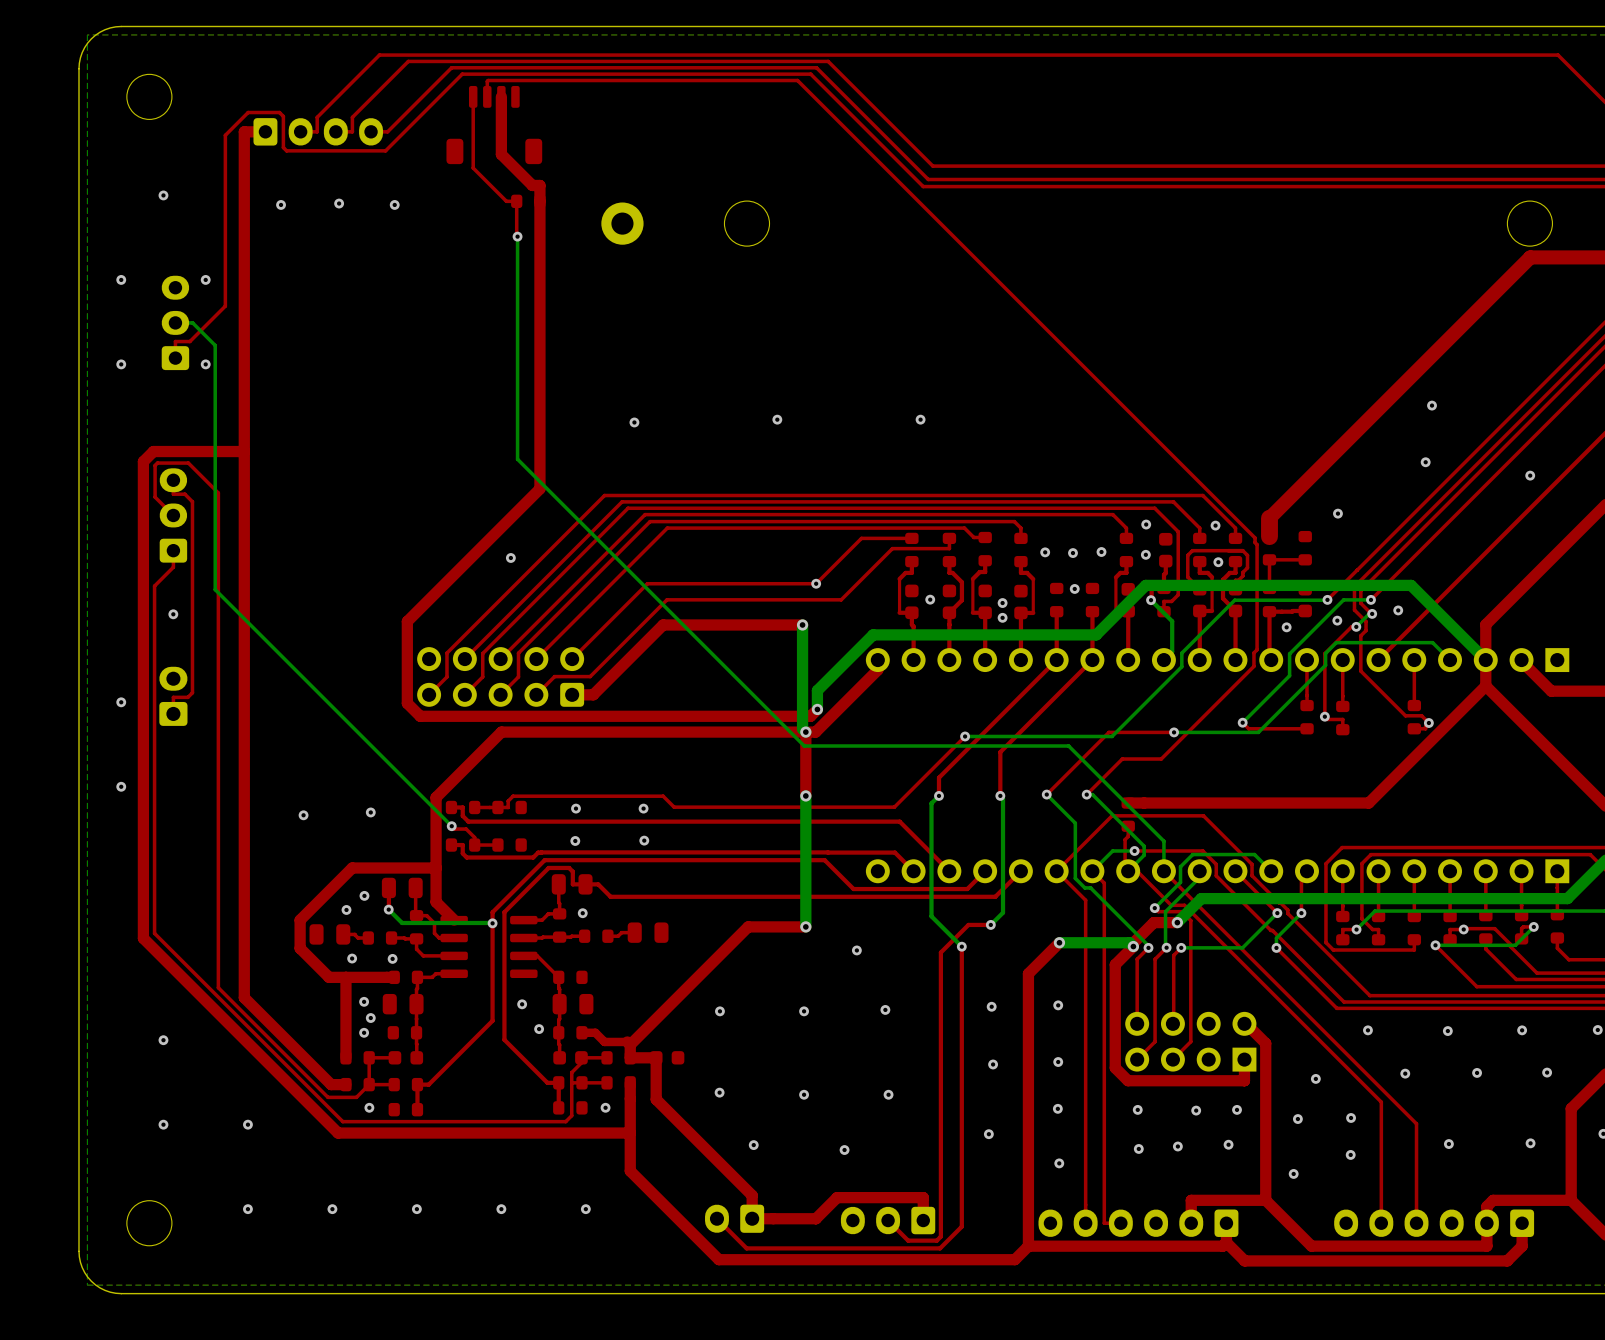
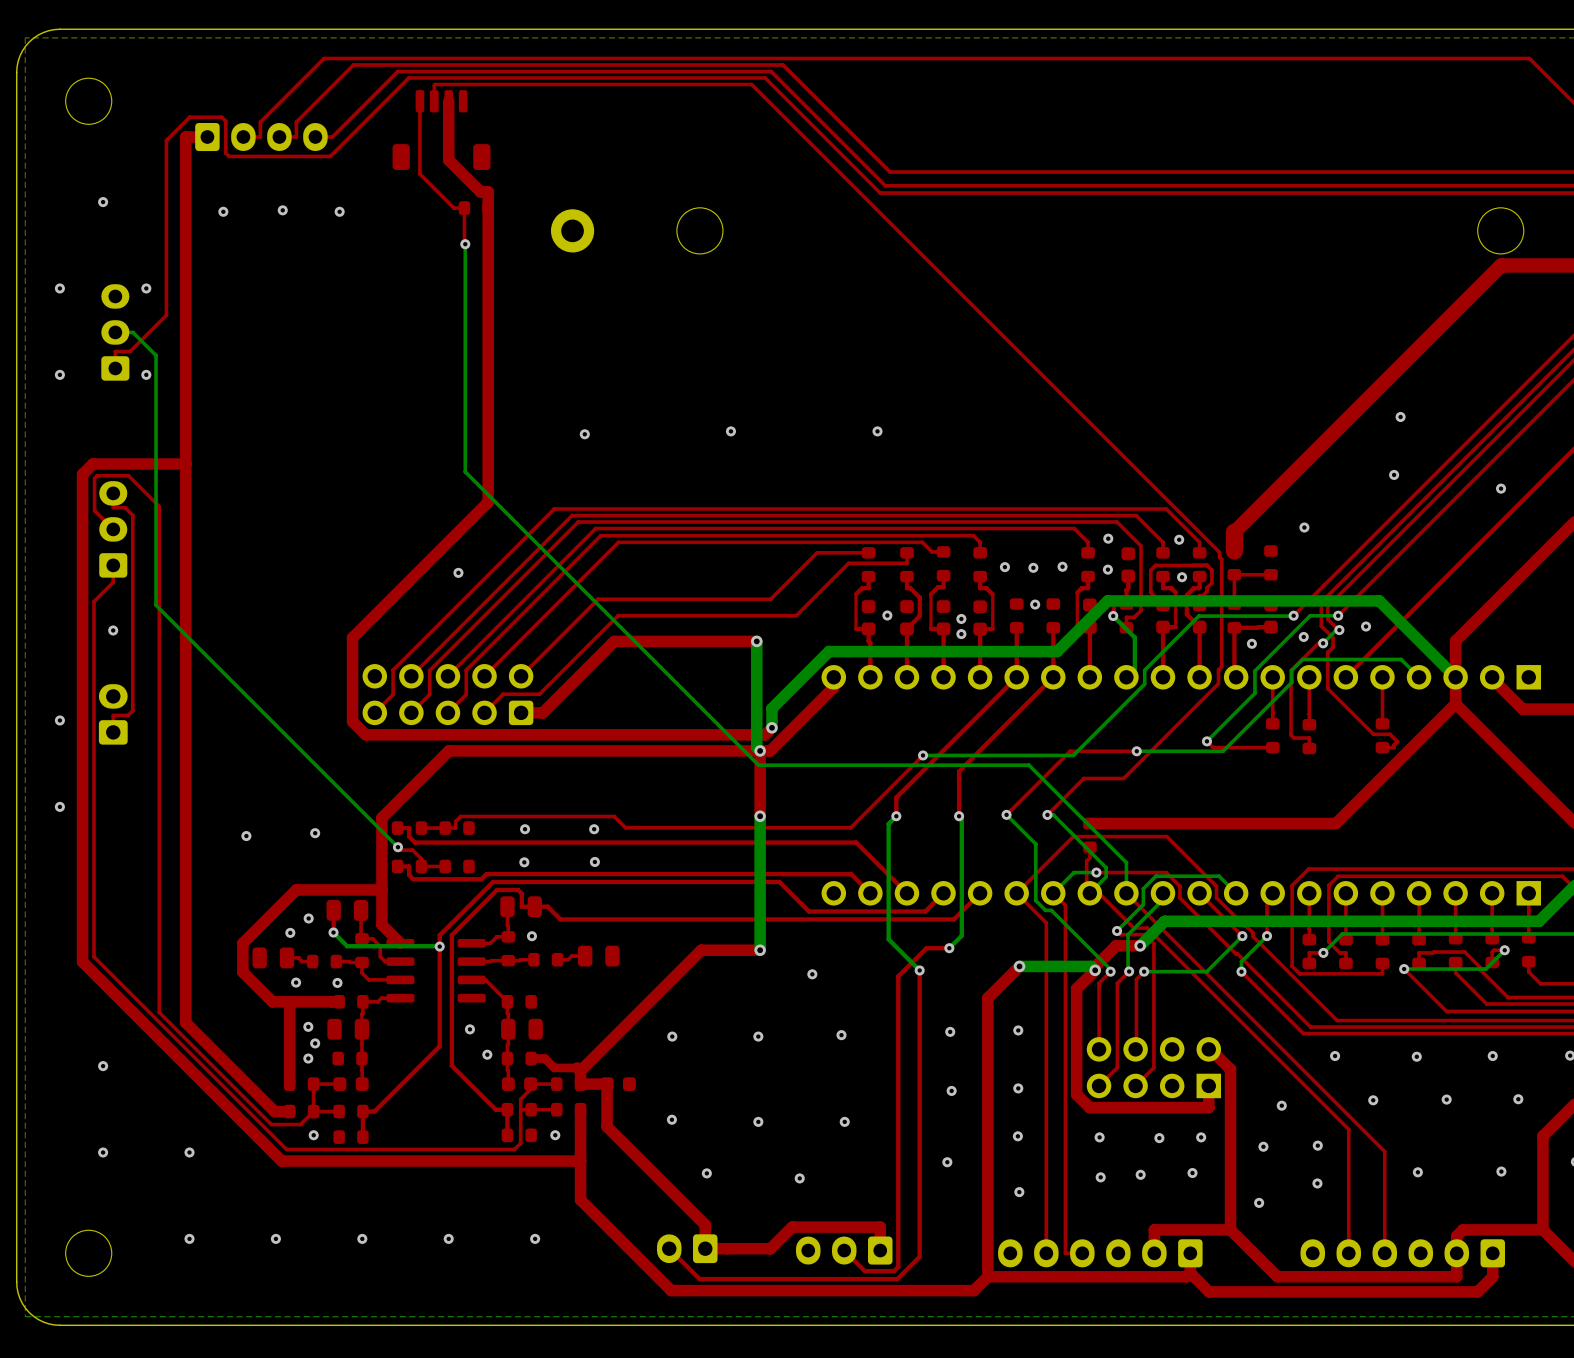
via: (816, 583) -> none
via: (1324, 716) -> none
via: (1428, 723) -> none
via: (1463, 929) -> none

